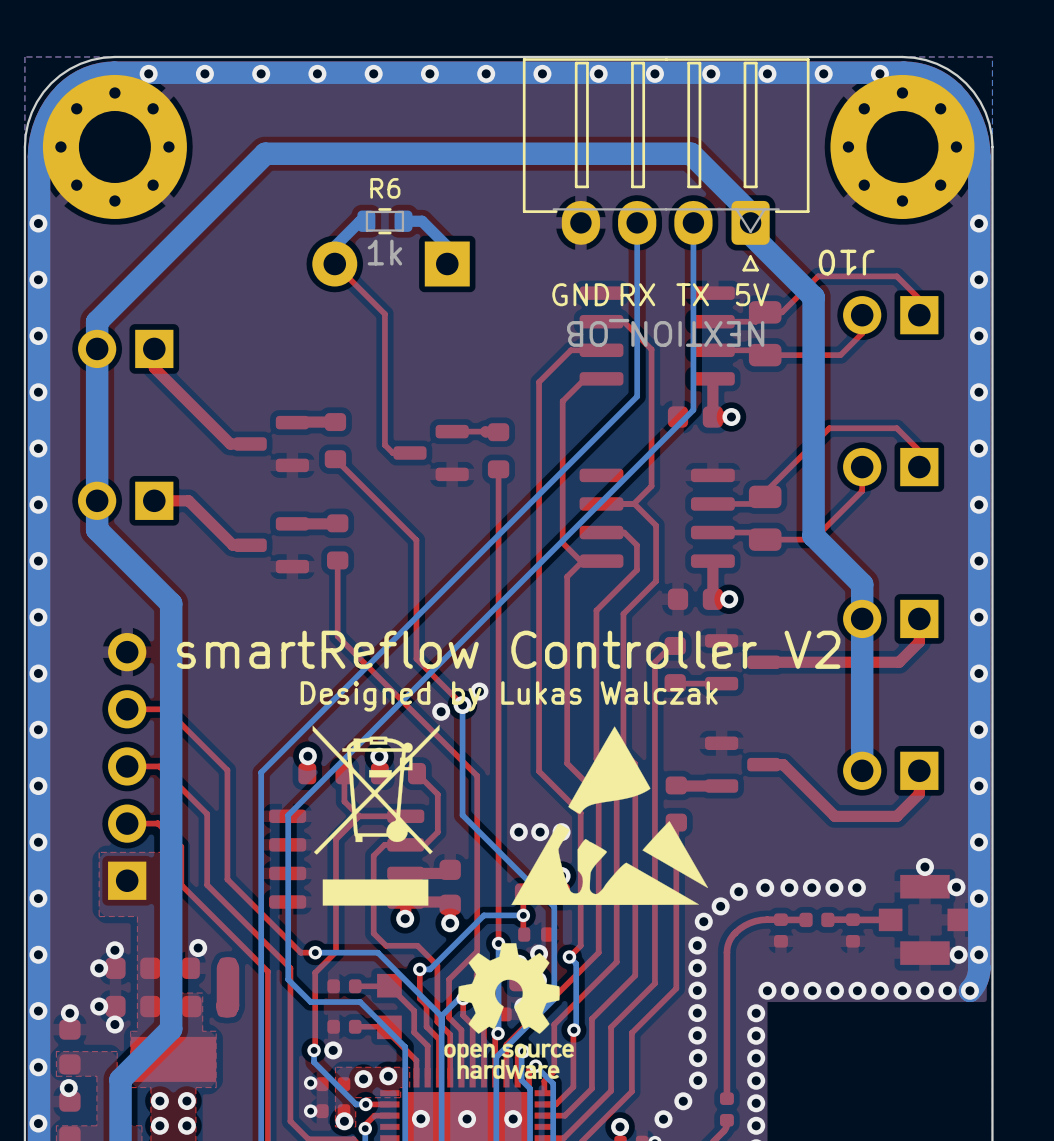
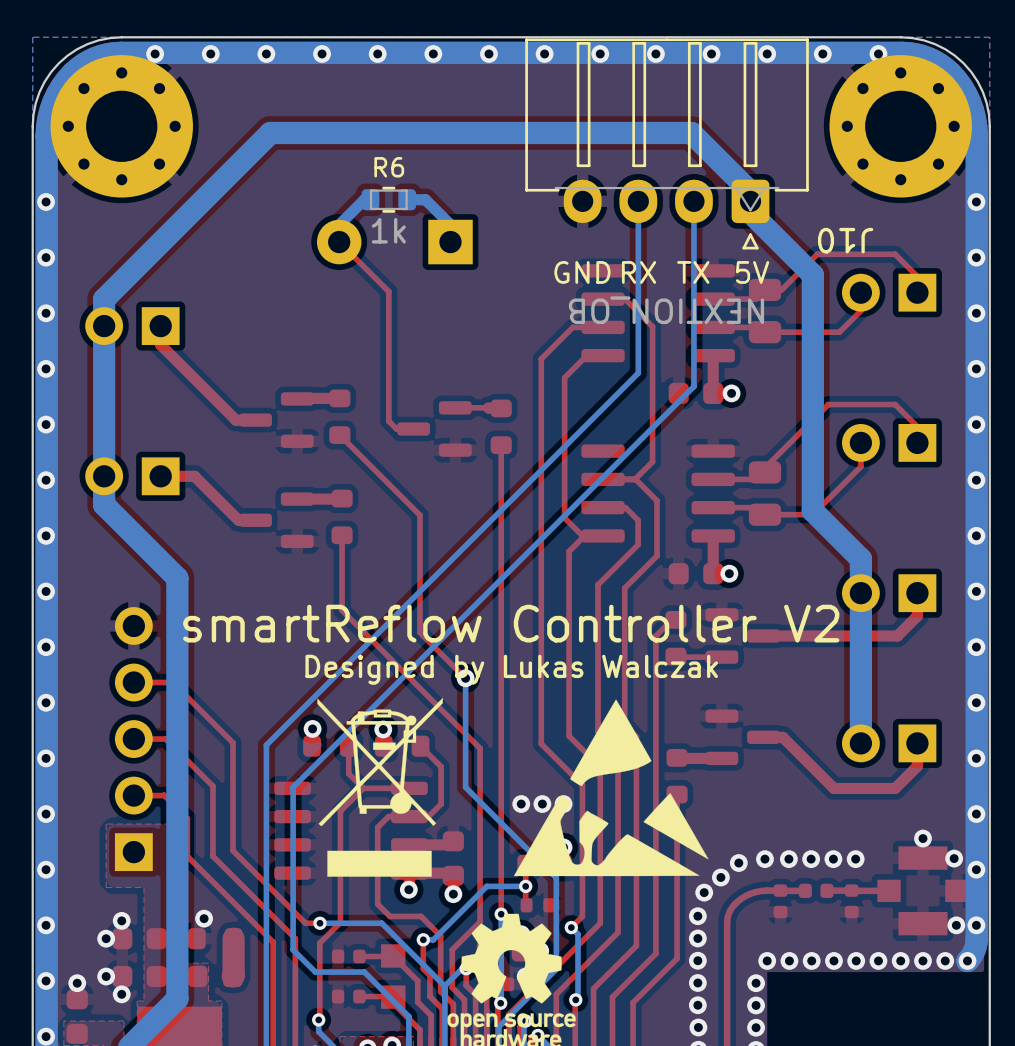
via: (479, 691) -> none
via: (441, 711) -> none
via: (539, 953) -> none
via: (333, 1050) -> none

